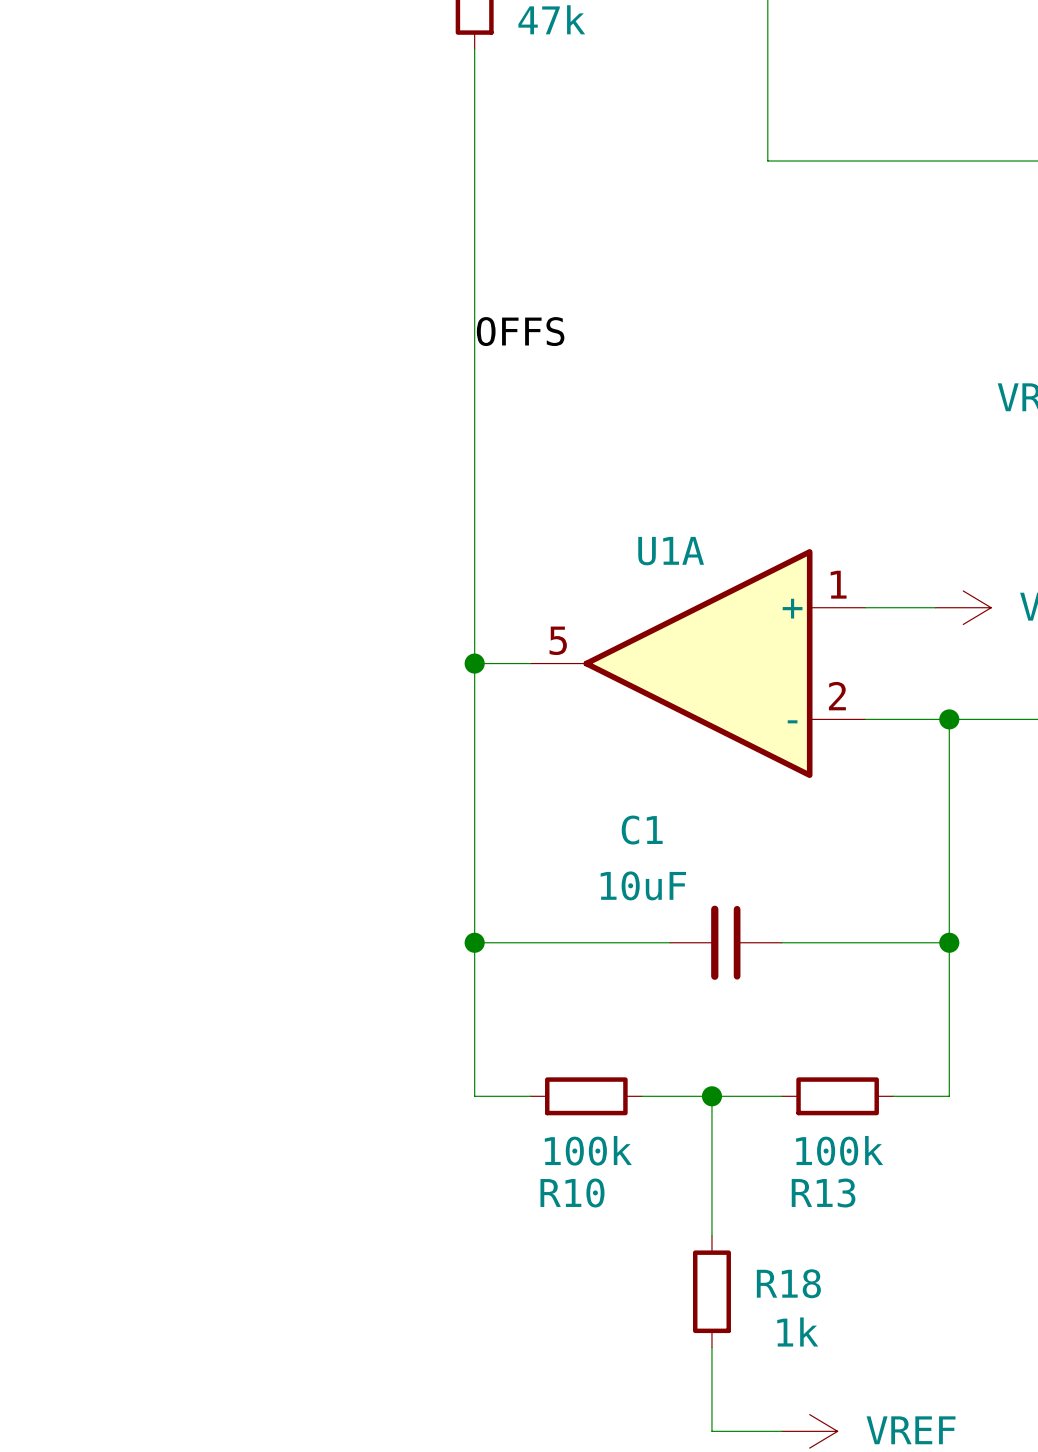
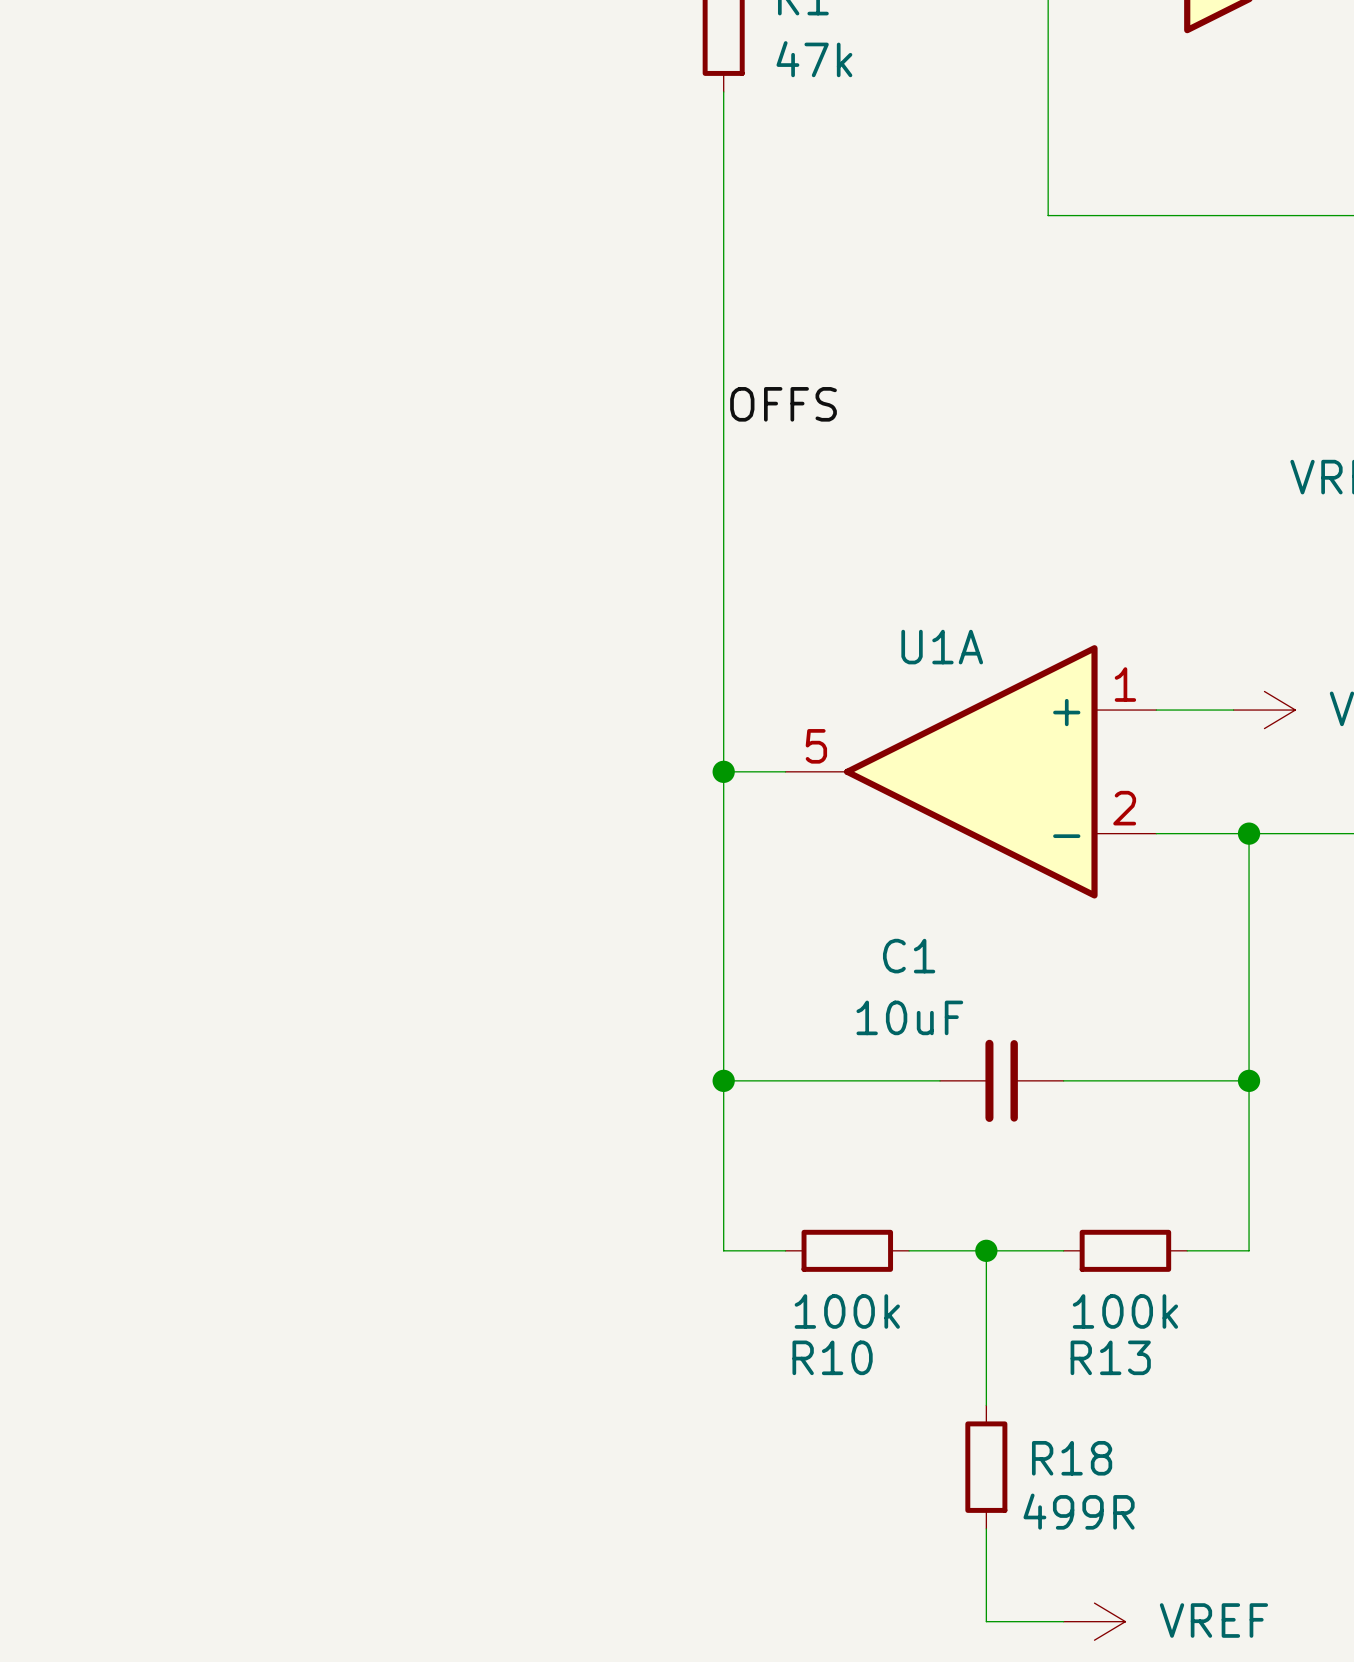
R18 value: 1k (797, 1332) -> 499R (1079, 1511)

